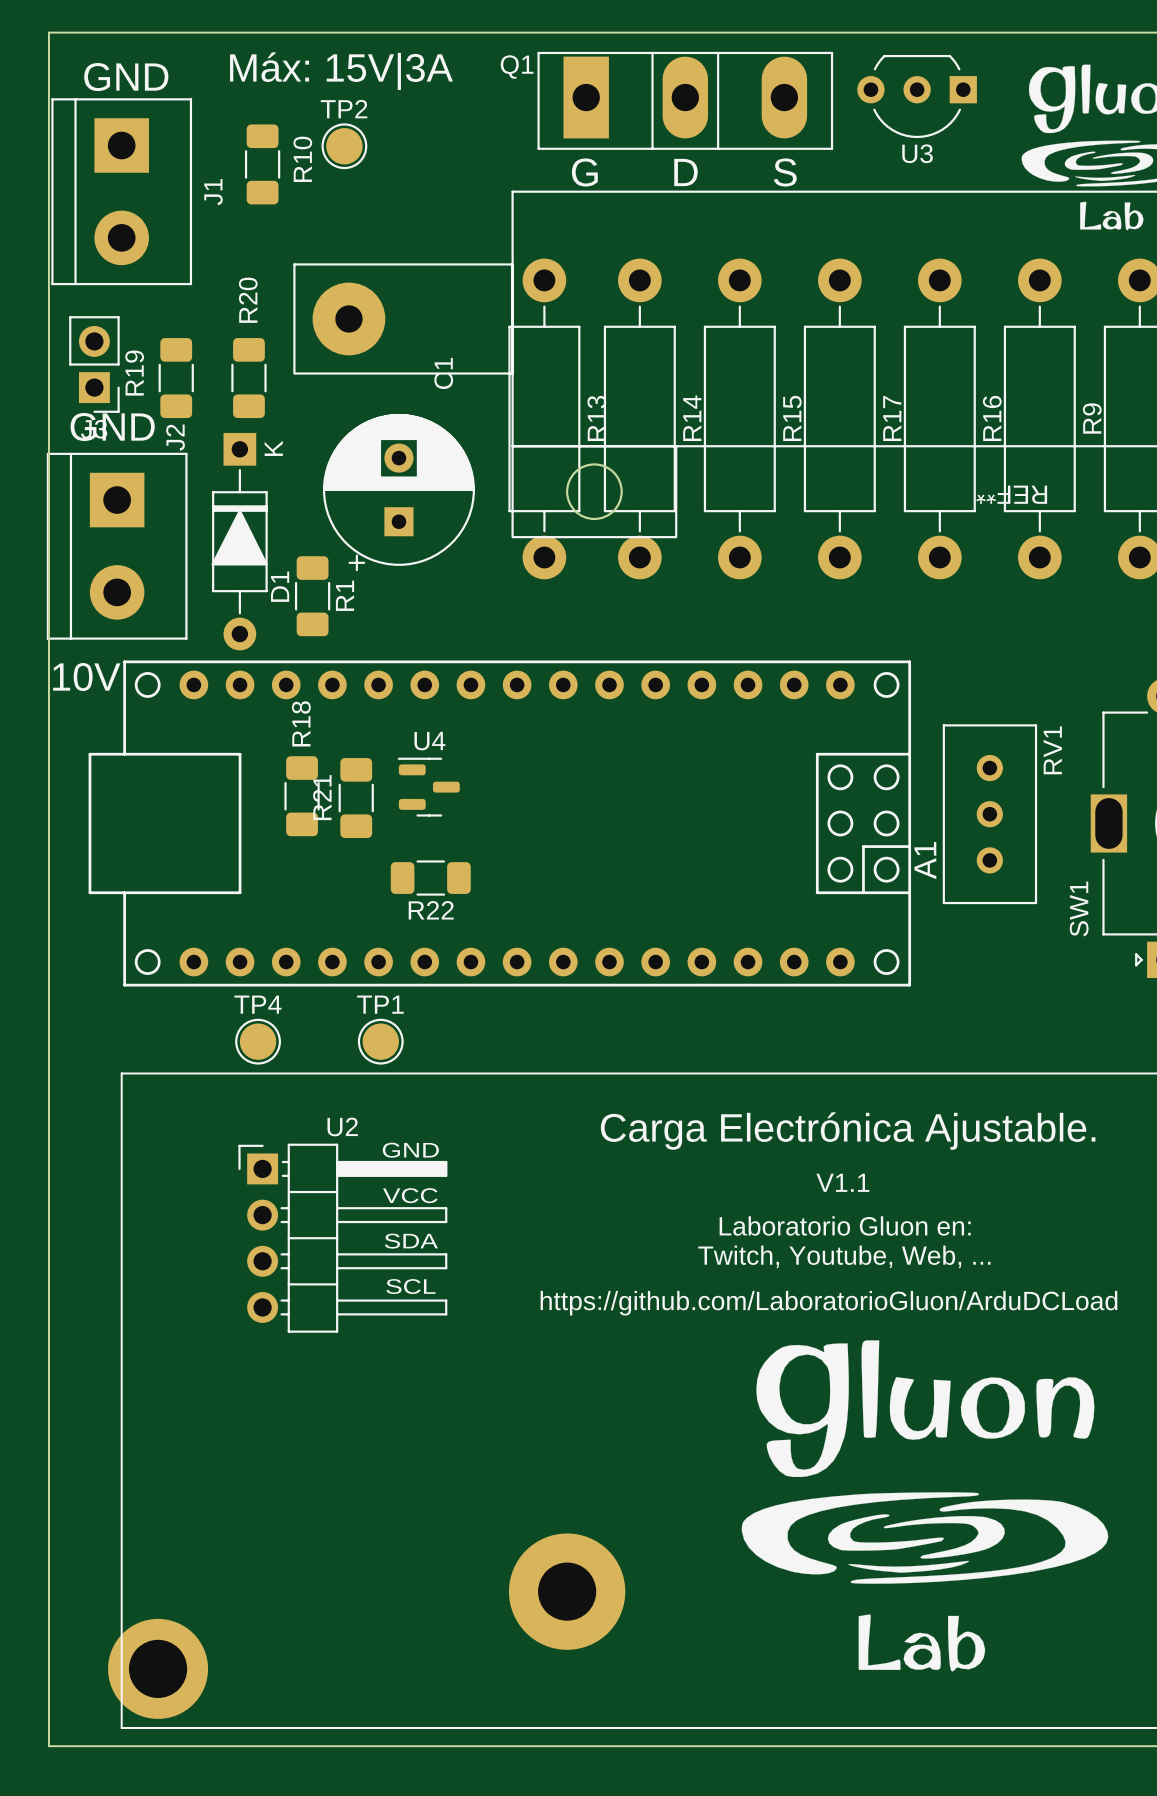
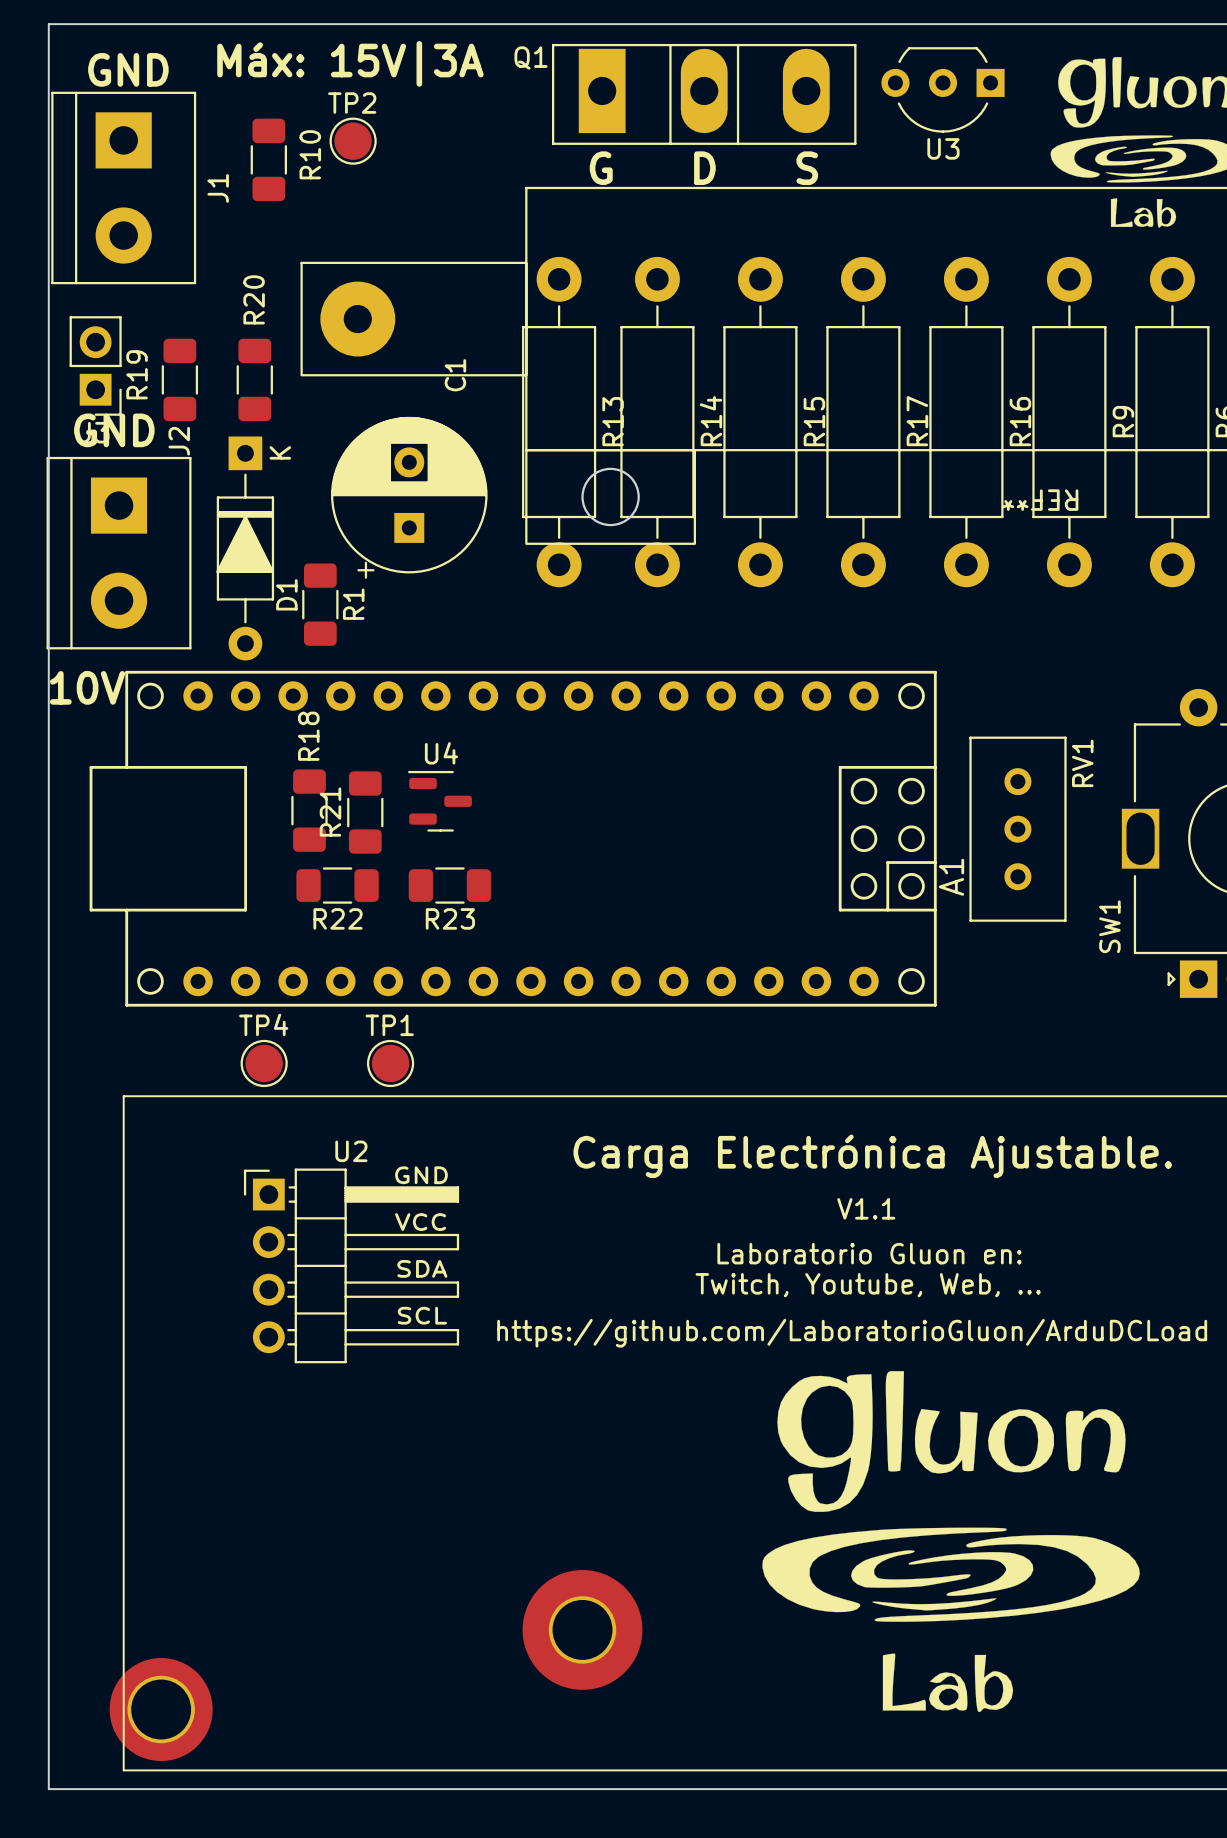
R23: none -> (449, 885)
R22 position: (430, 878) -> (337, 885)

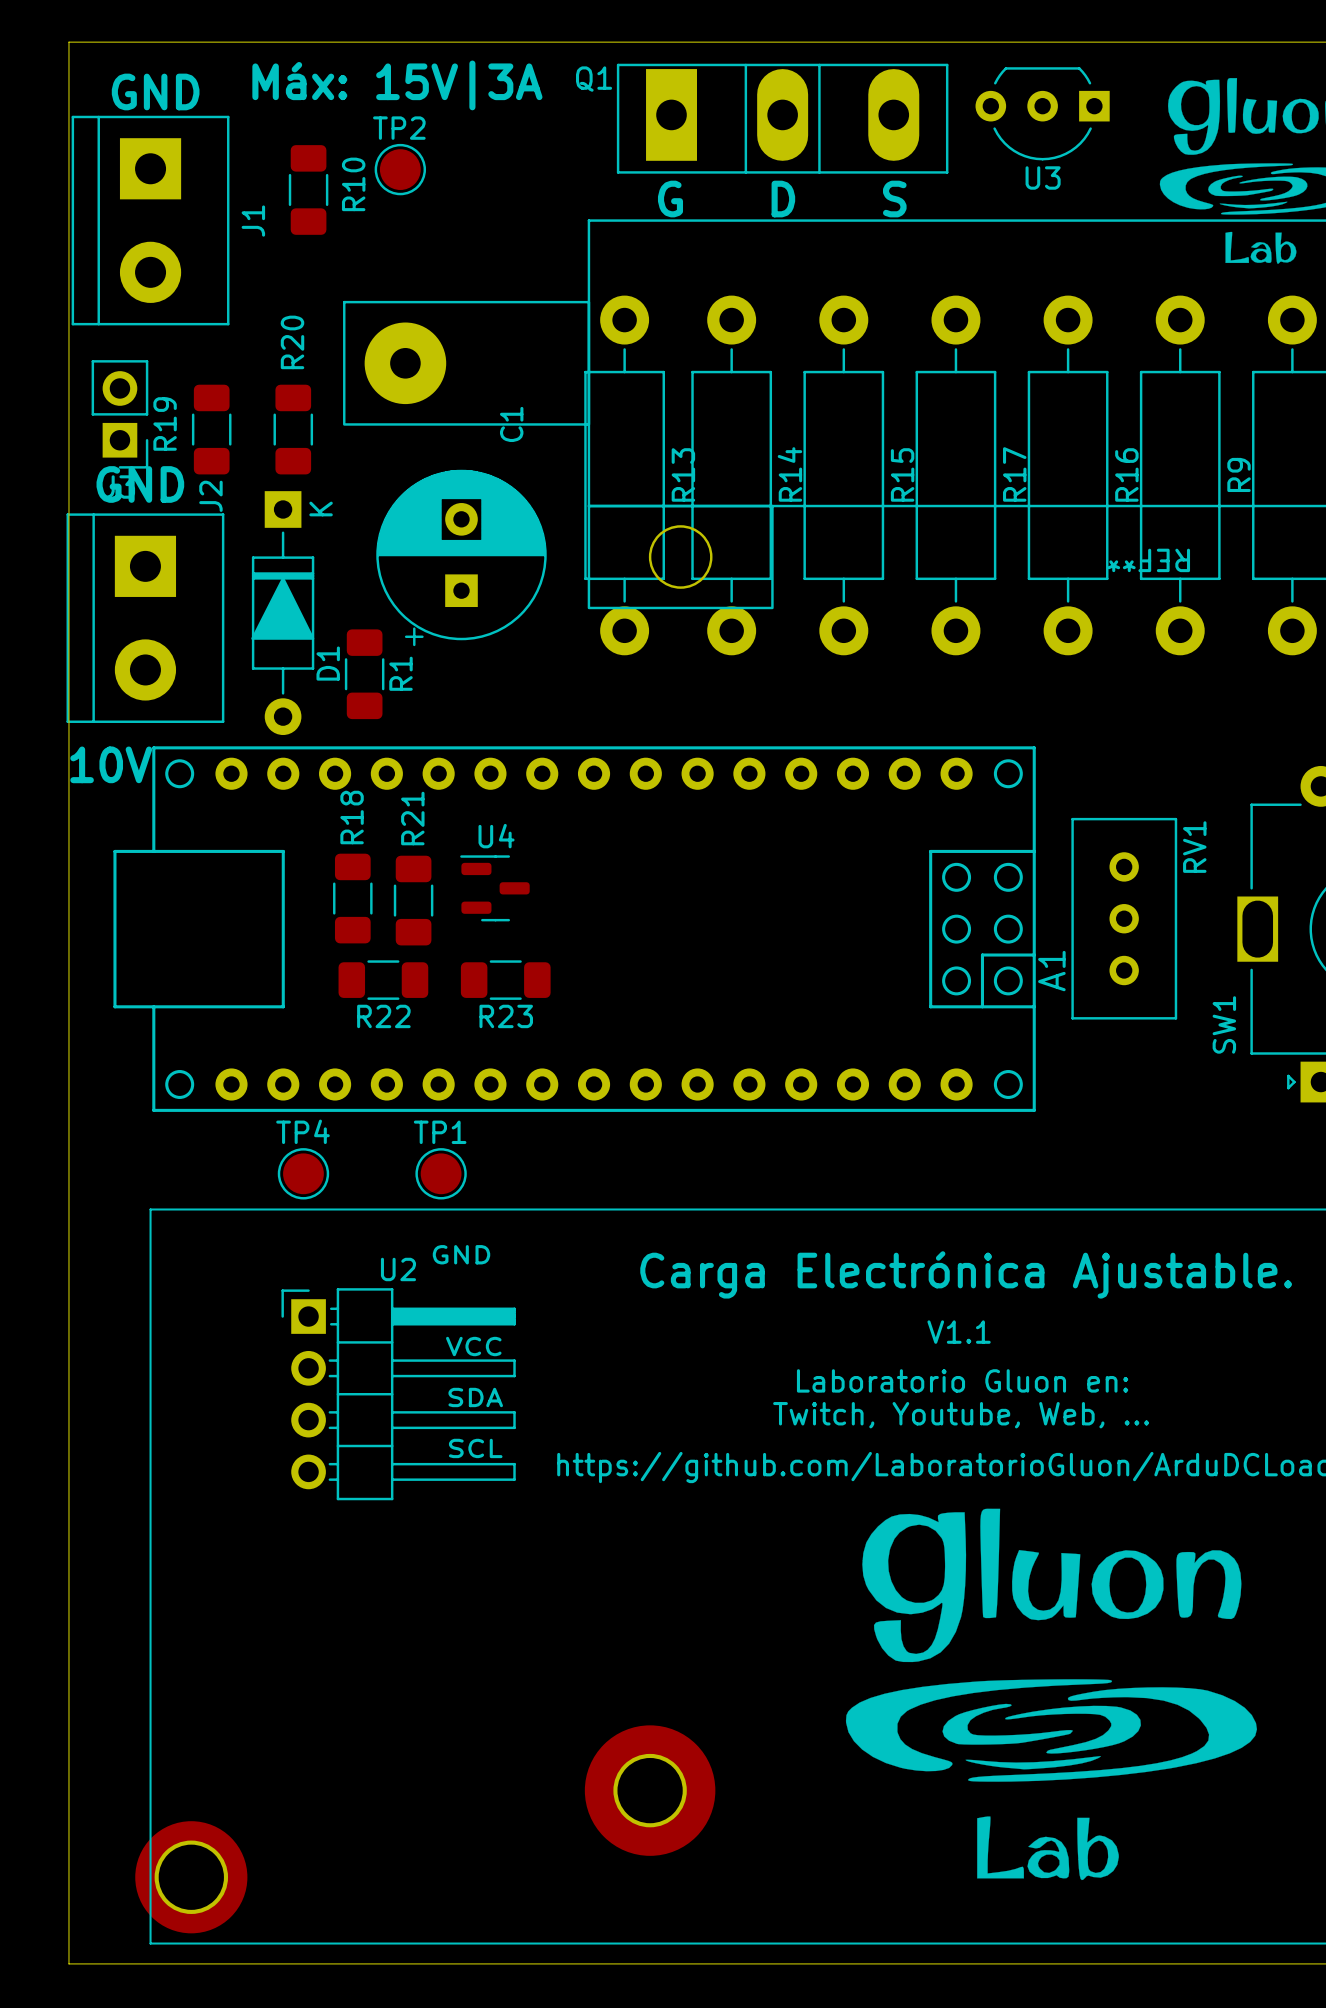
R21 name position: R21 (330, 812) -> R21 (412, 818)
text position: GND (421, 1175) -> GND (461, 1254)

